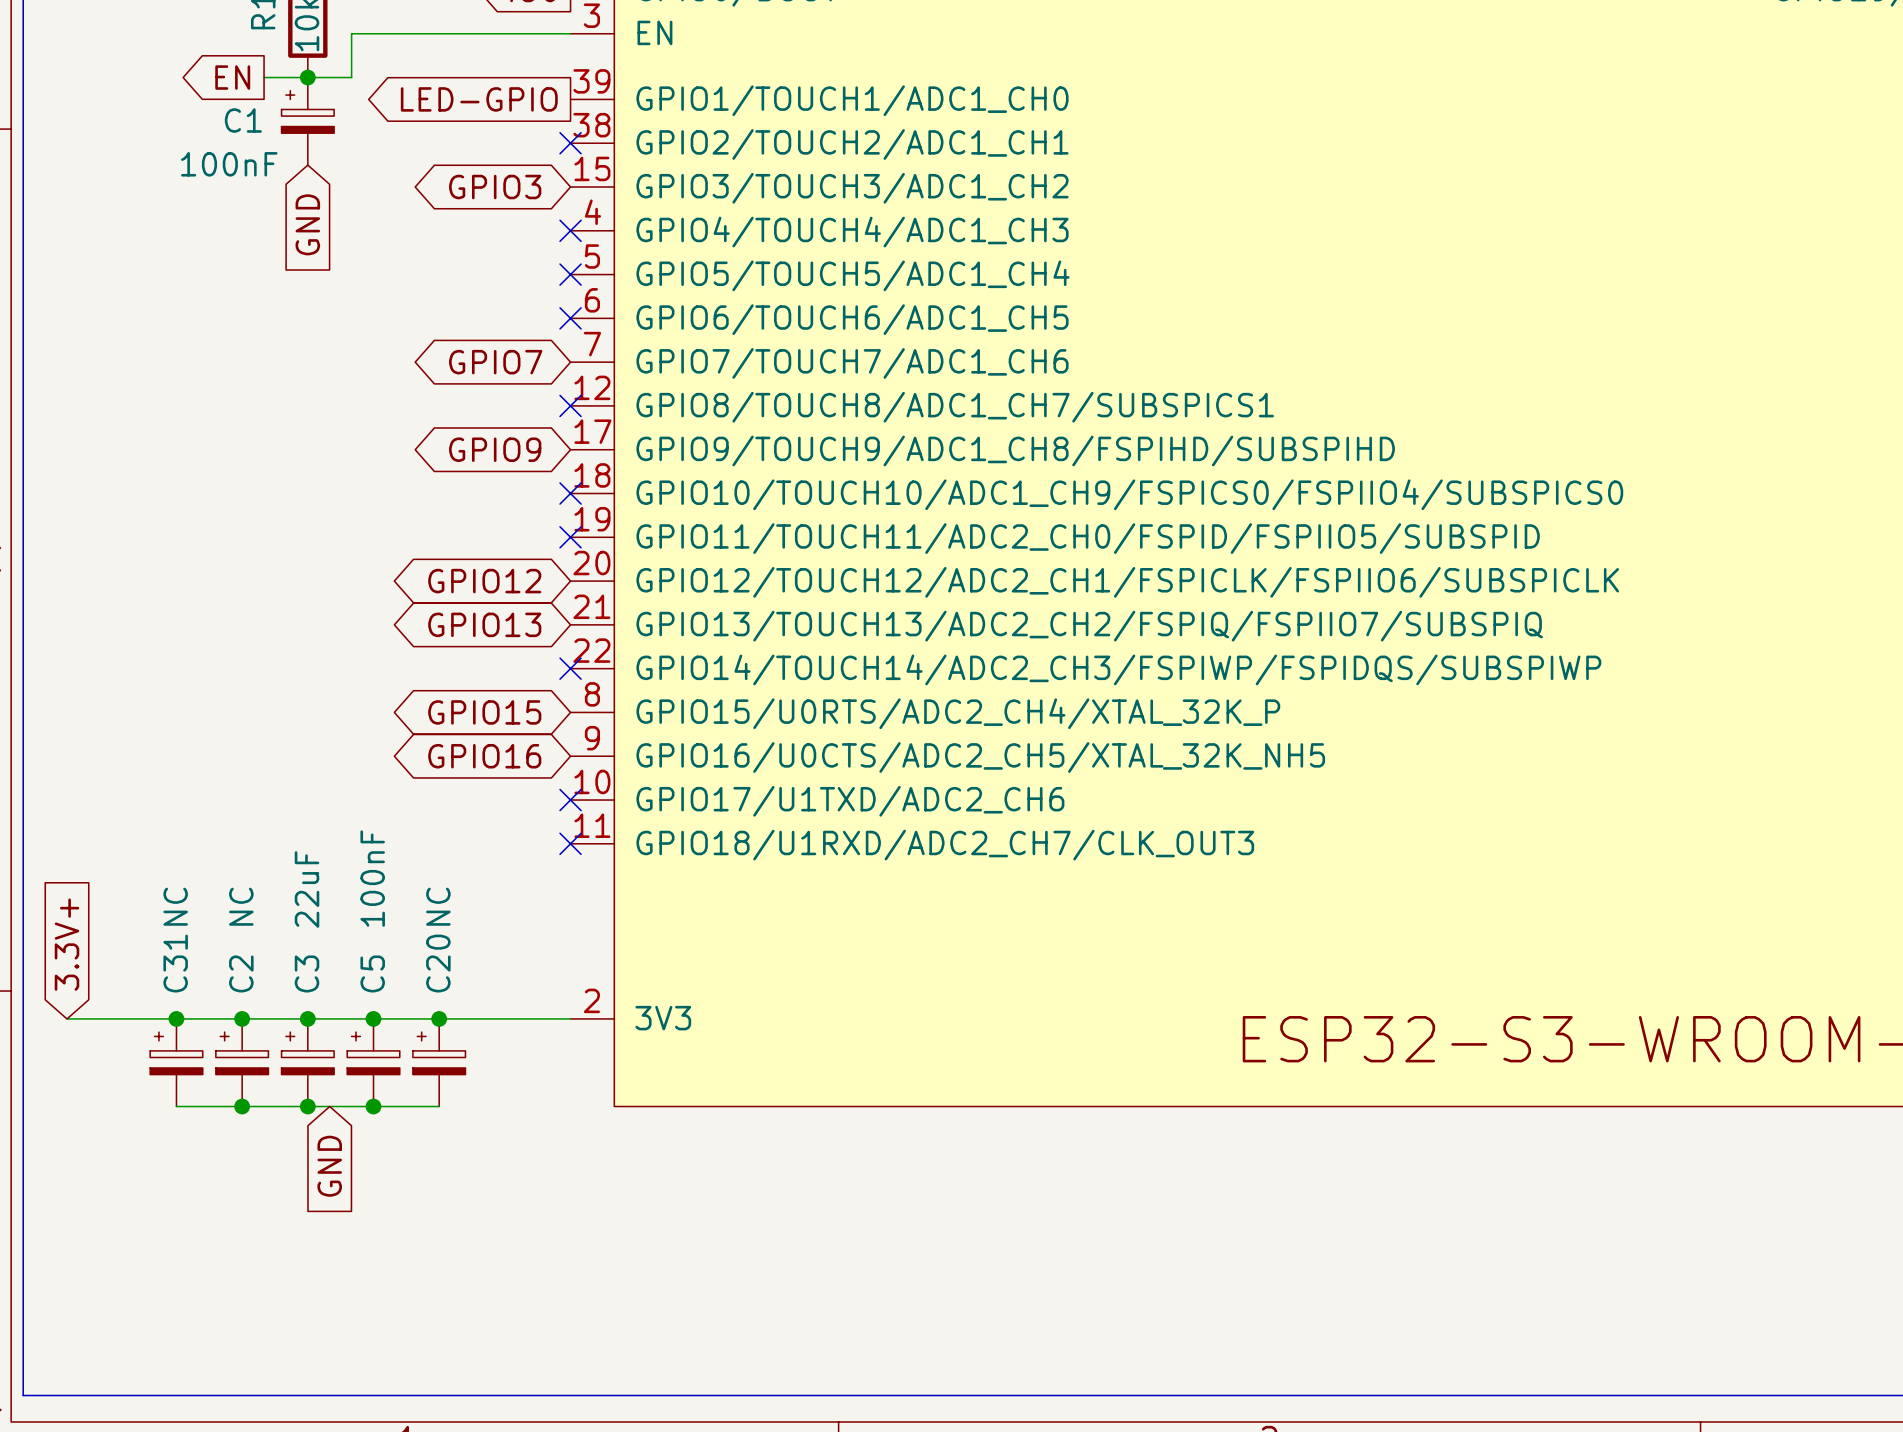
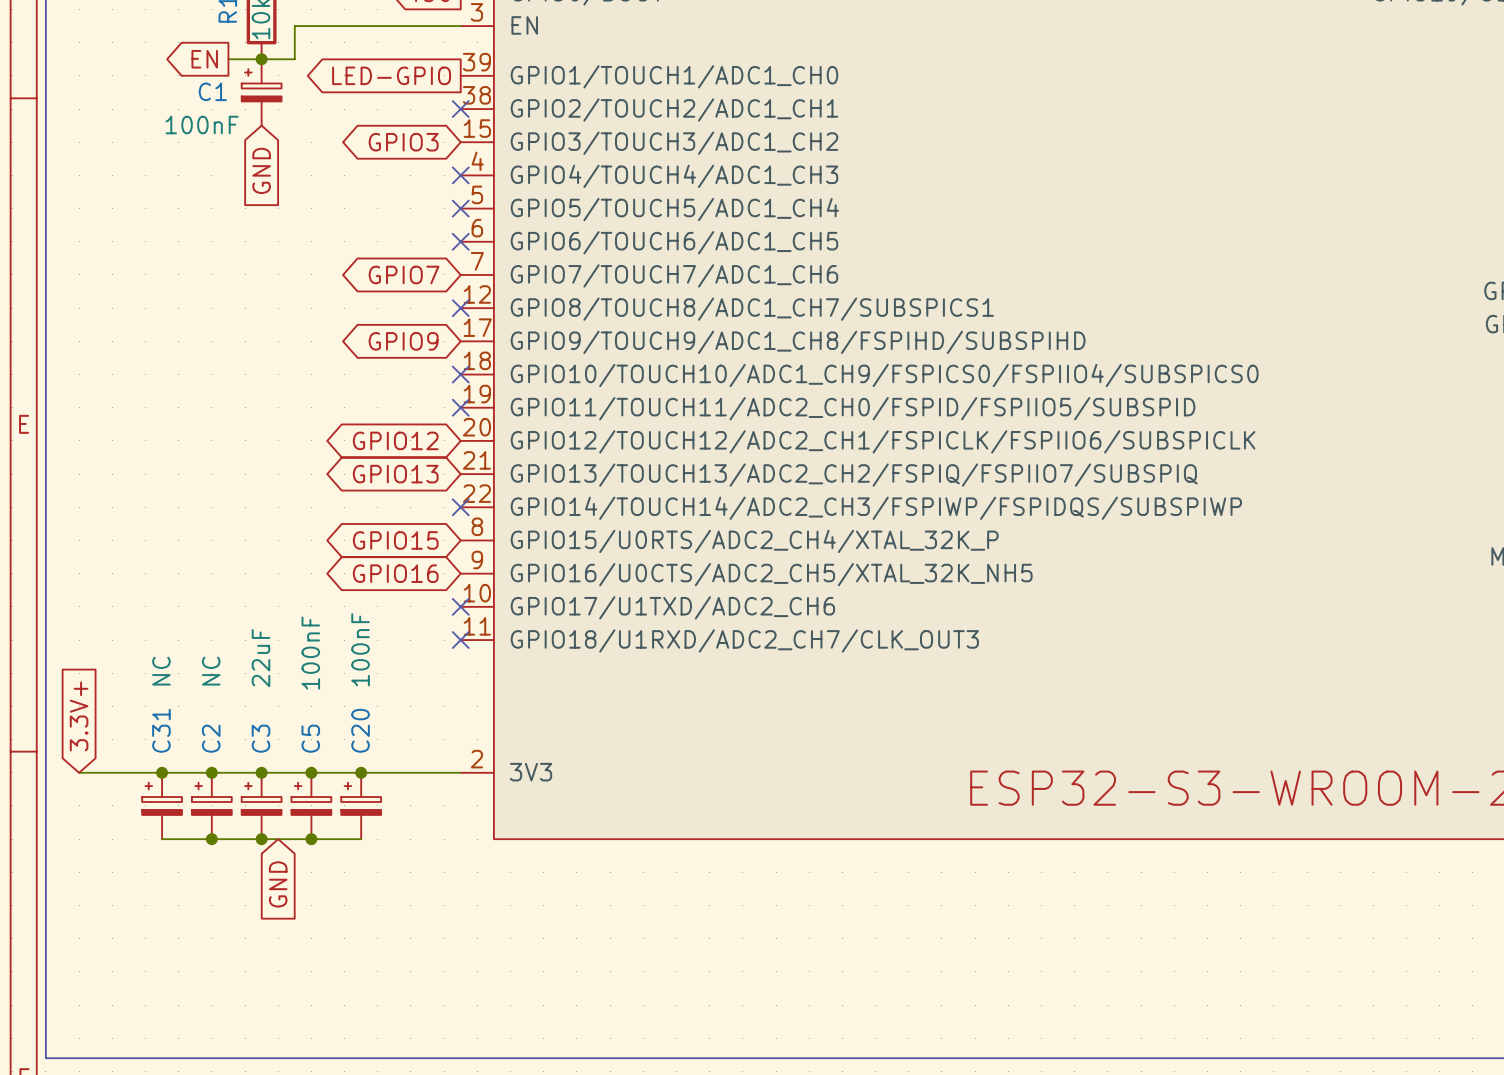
C5 value position: 100nF (372, 878) -> 100nF (310, 653)
C3 value position: 22uF (307, 889) -> 22uF (260, 658)
C31 value position: NC (175, 906) -> NC (161, 671)
C2 value position: NC (241, 906) -> NC (211, 671)
C20 value: NC (438, 906) -> 100nF (360, 649)

